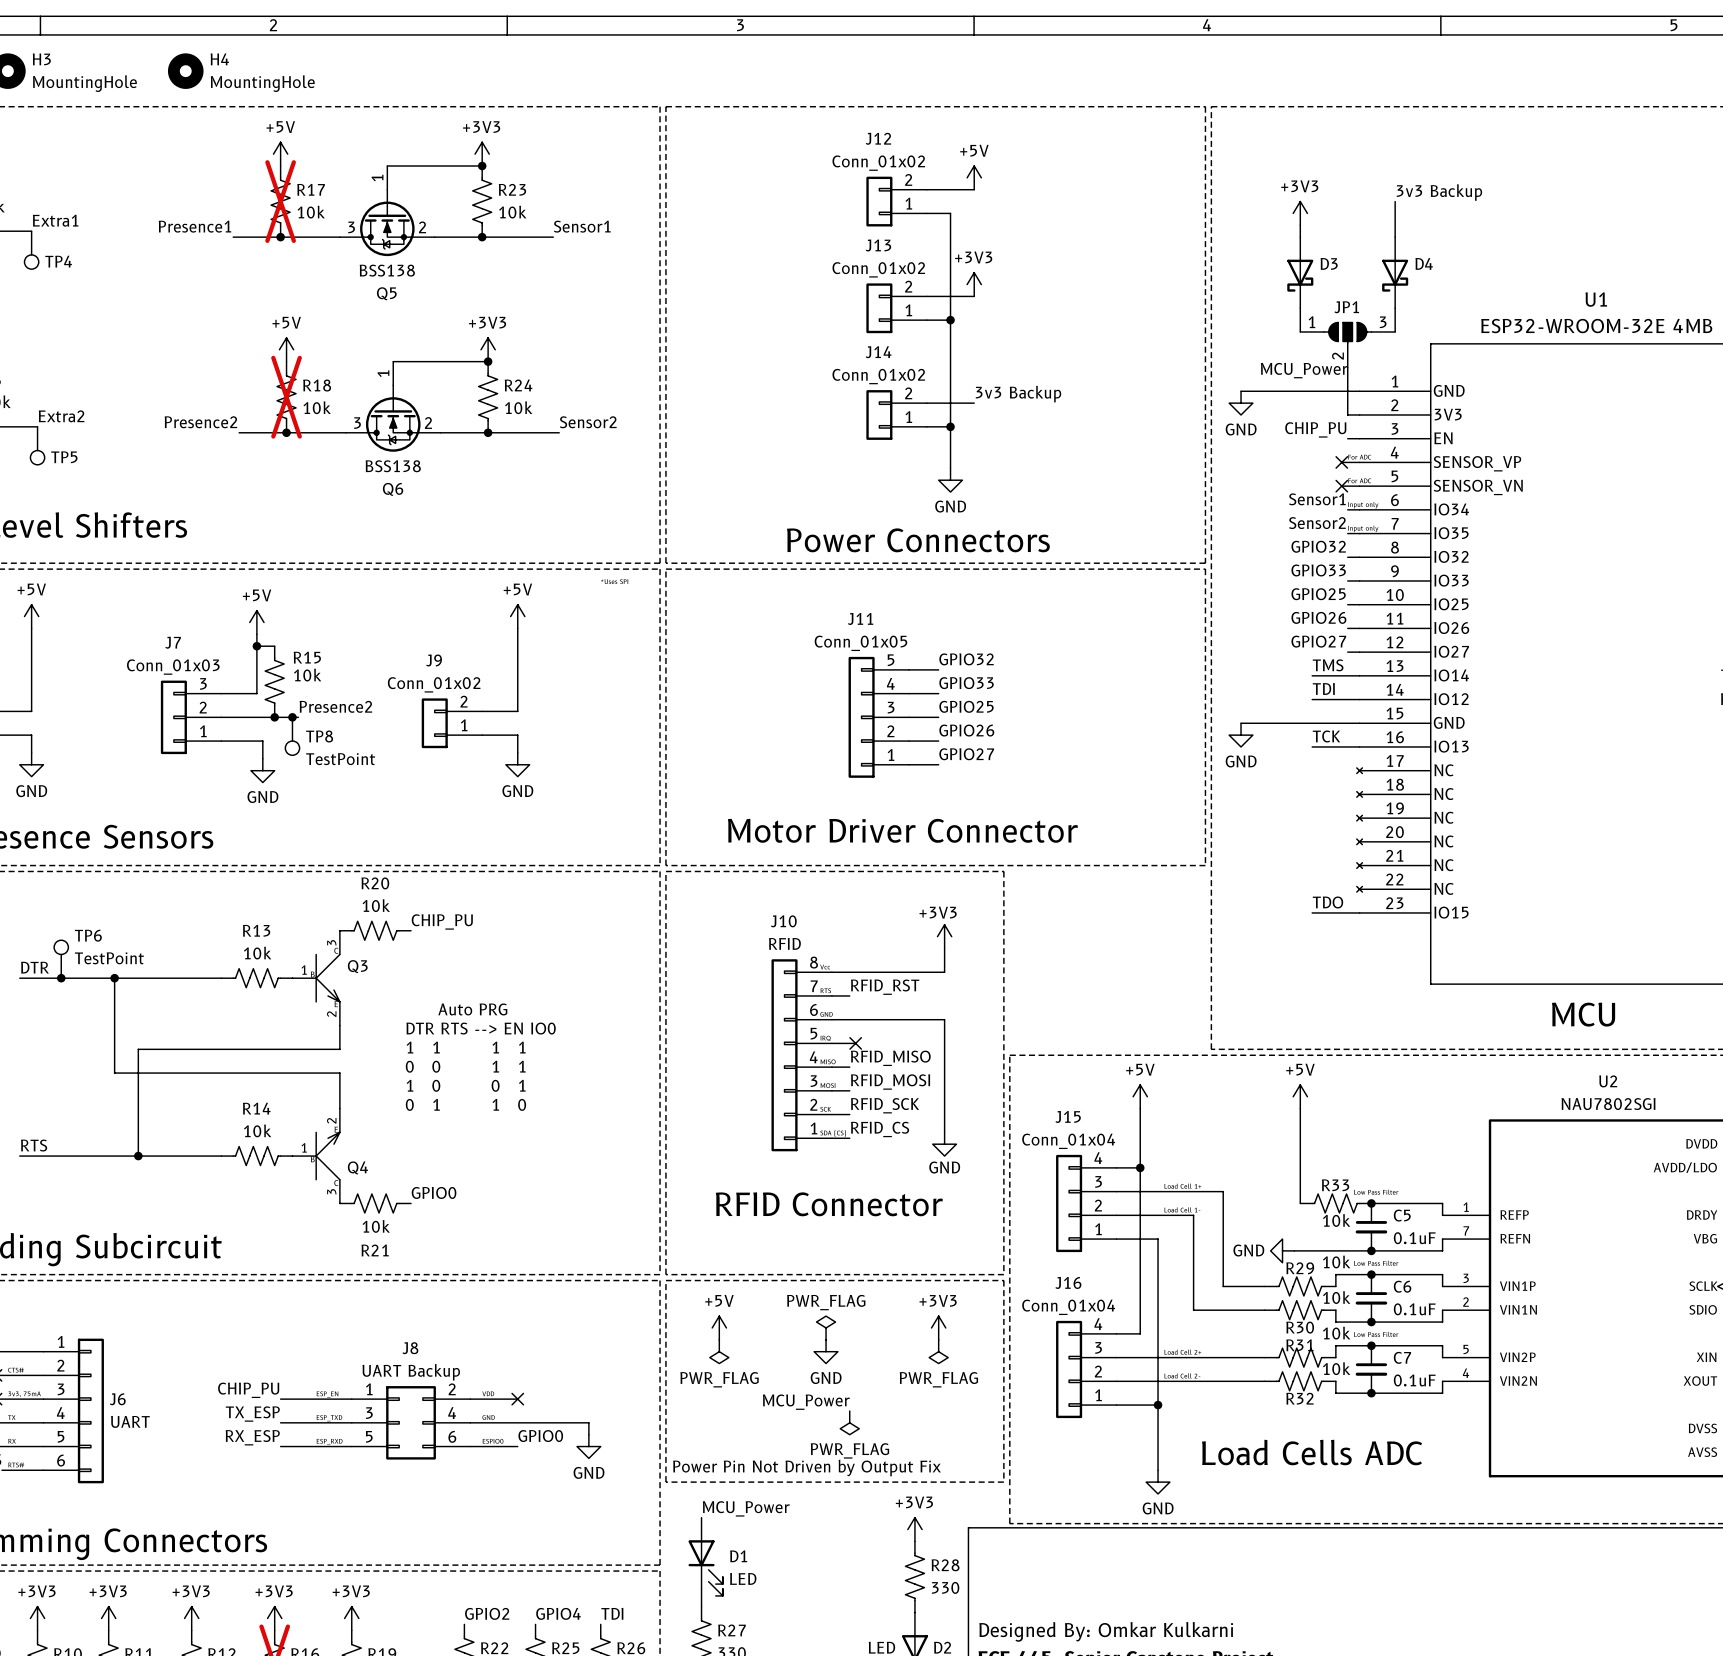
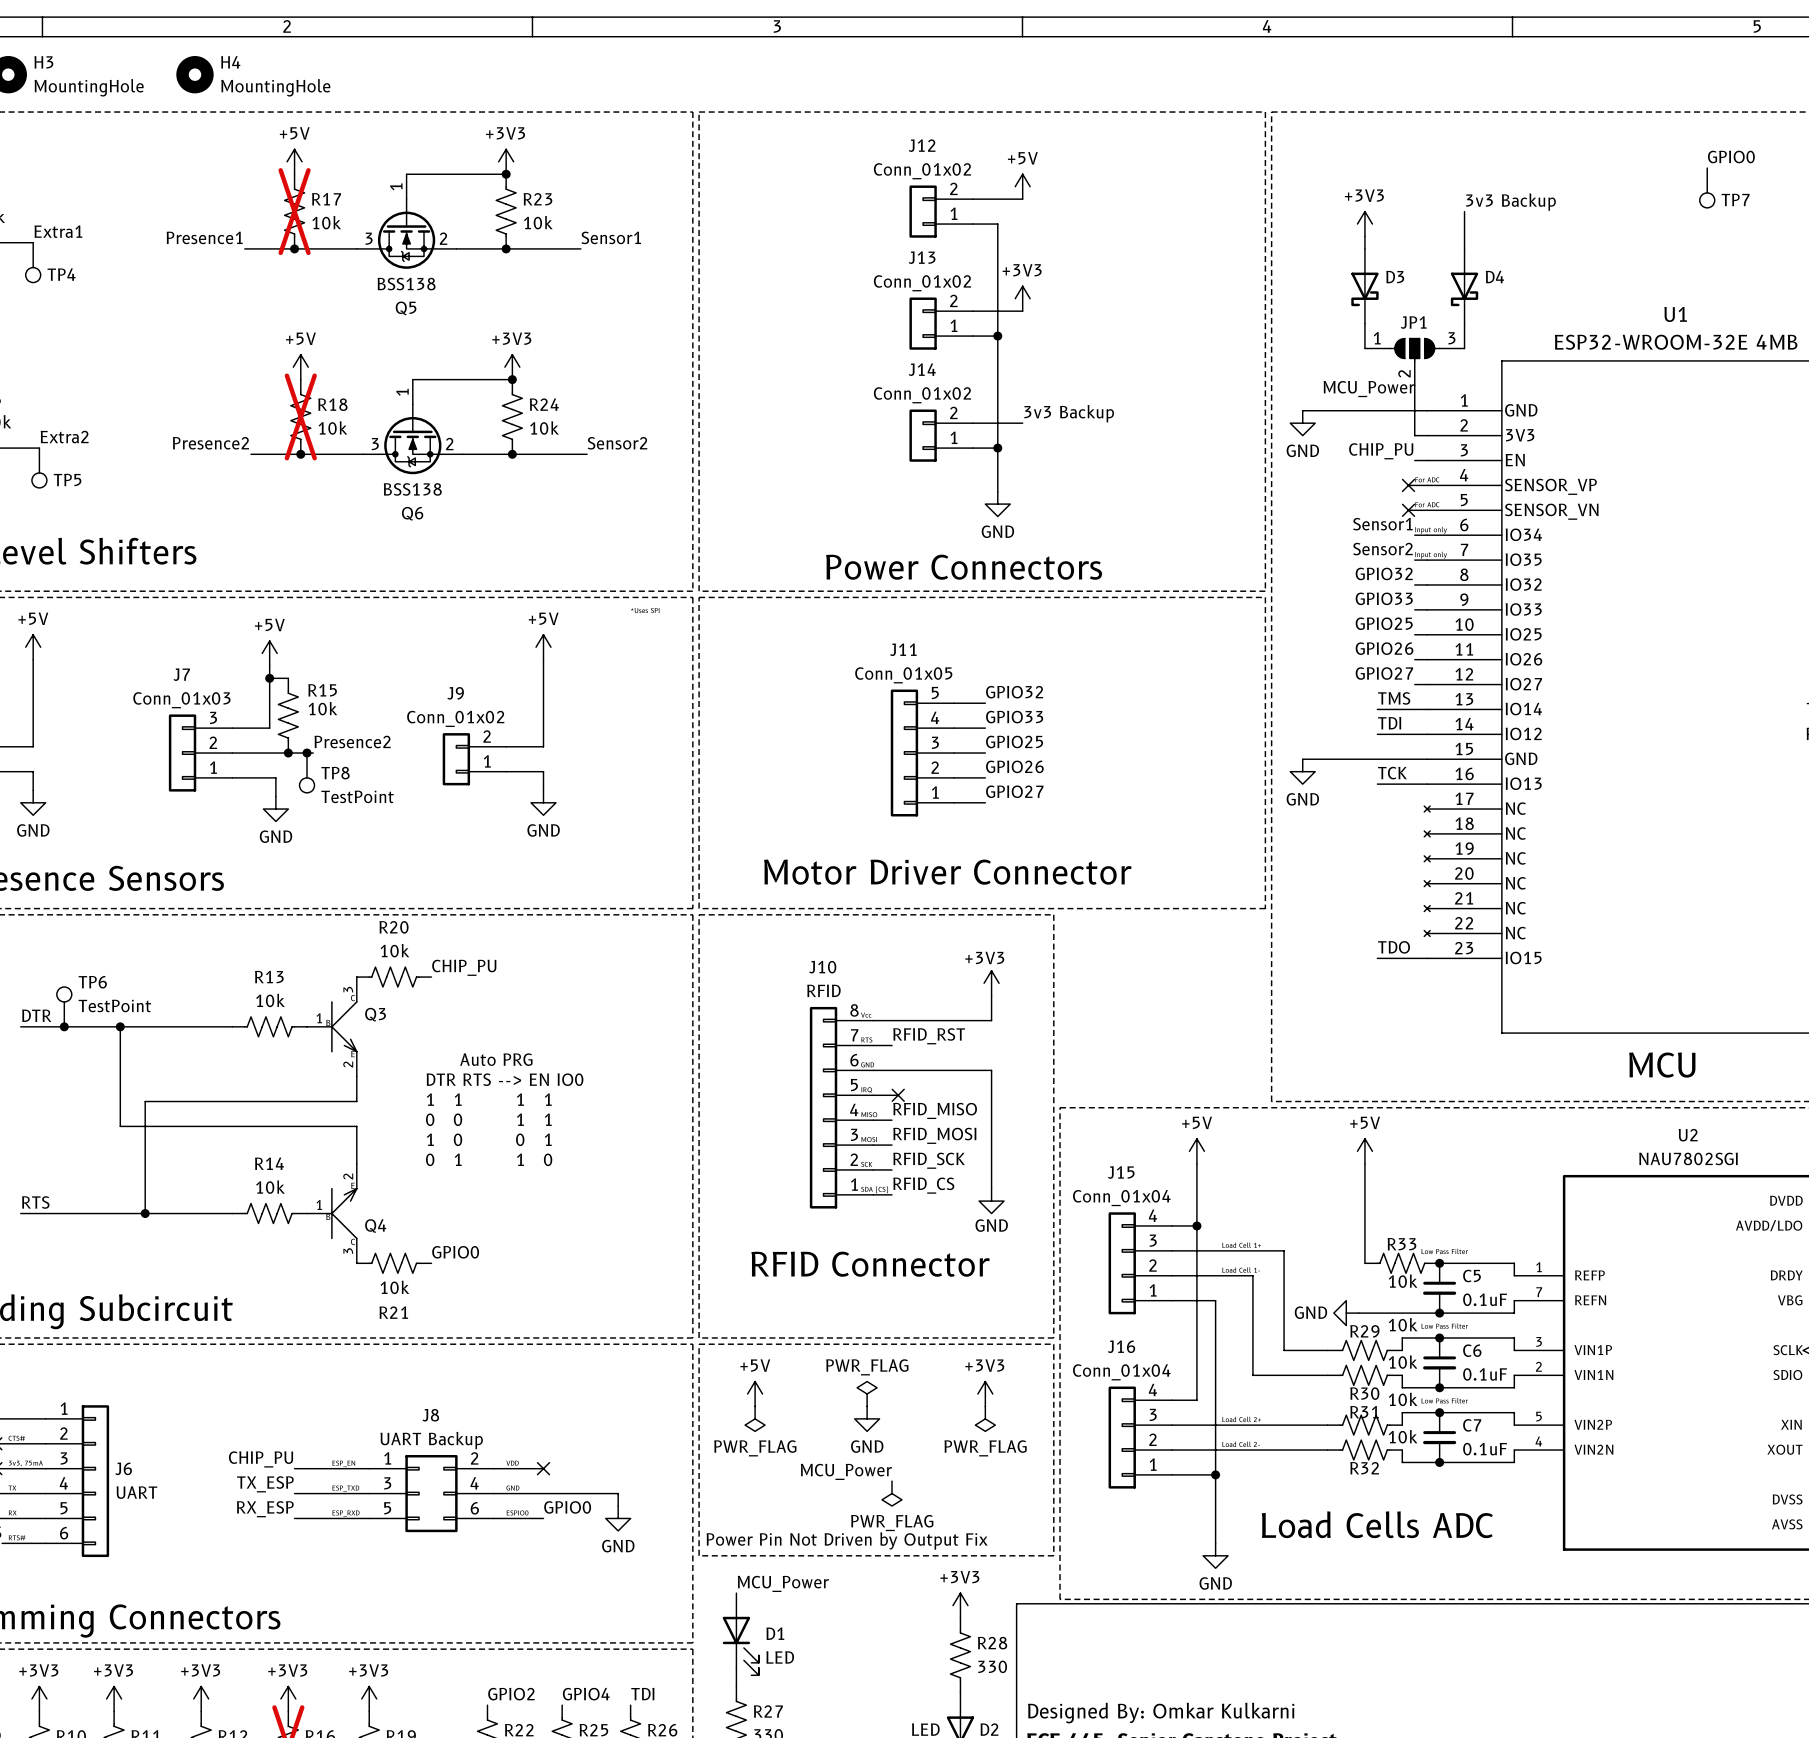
label: none -> GPIO0 (1731, 156)
TP7: none -> (1707, 187)

